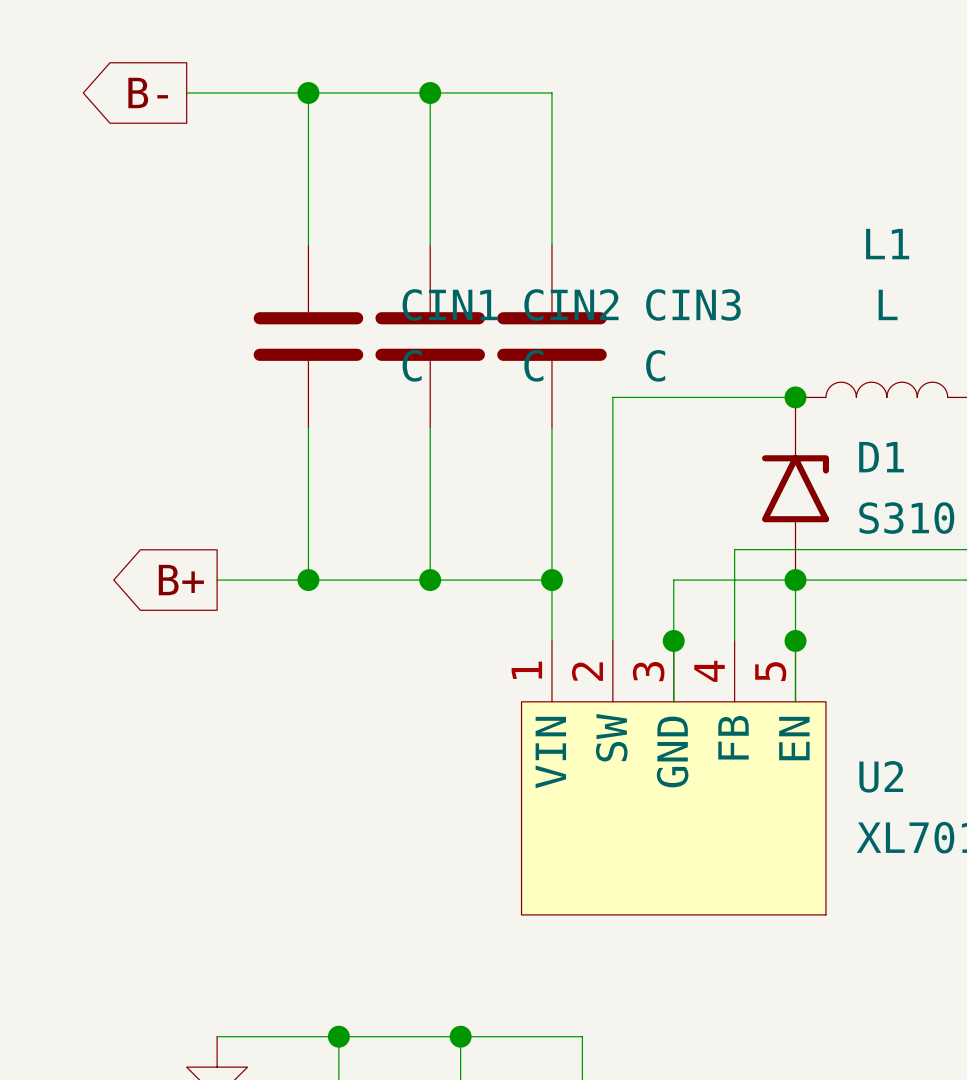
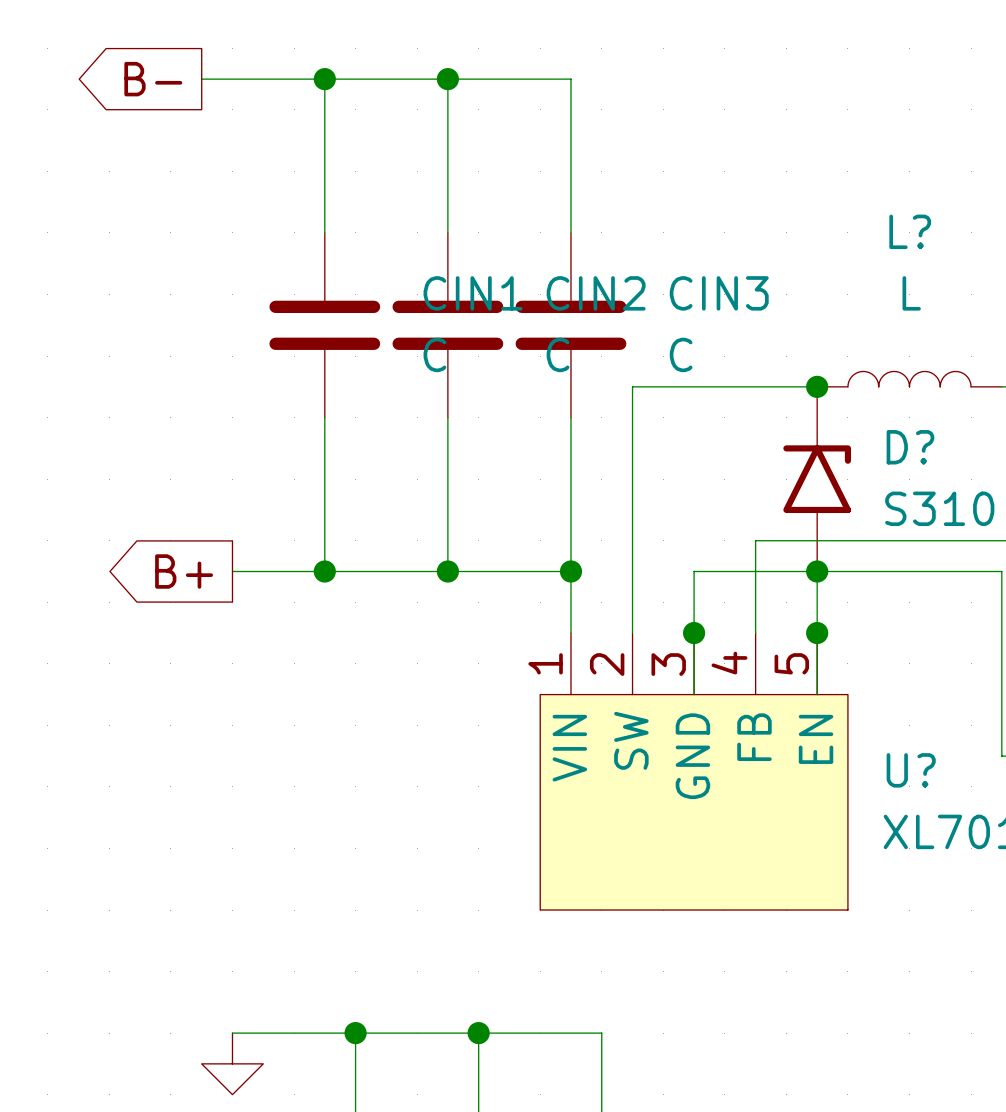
L1 name: L1 (887, 244) -> L? (910, 231)
D1 name: D1 (881, 457) -> D? (910, 447)
U2 name: U2 (881, 776) -> U? (911, 770)

